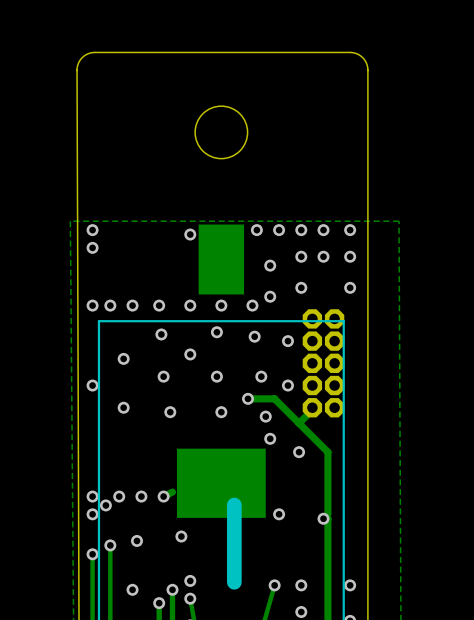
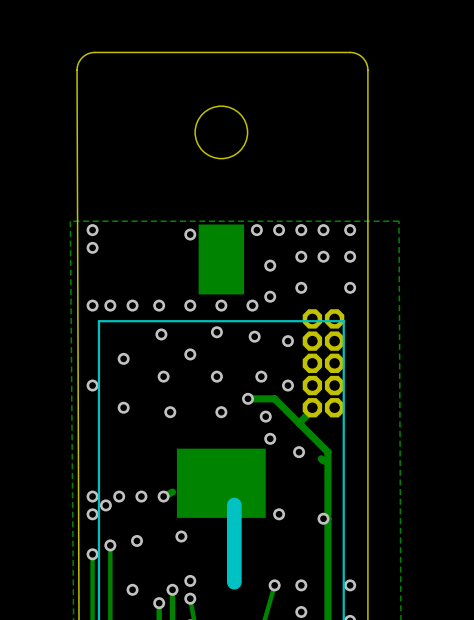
track: none -> (321, 458) (323, 461)

